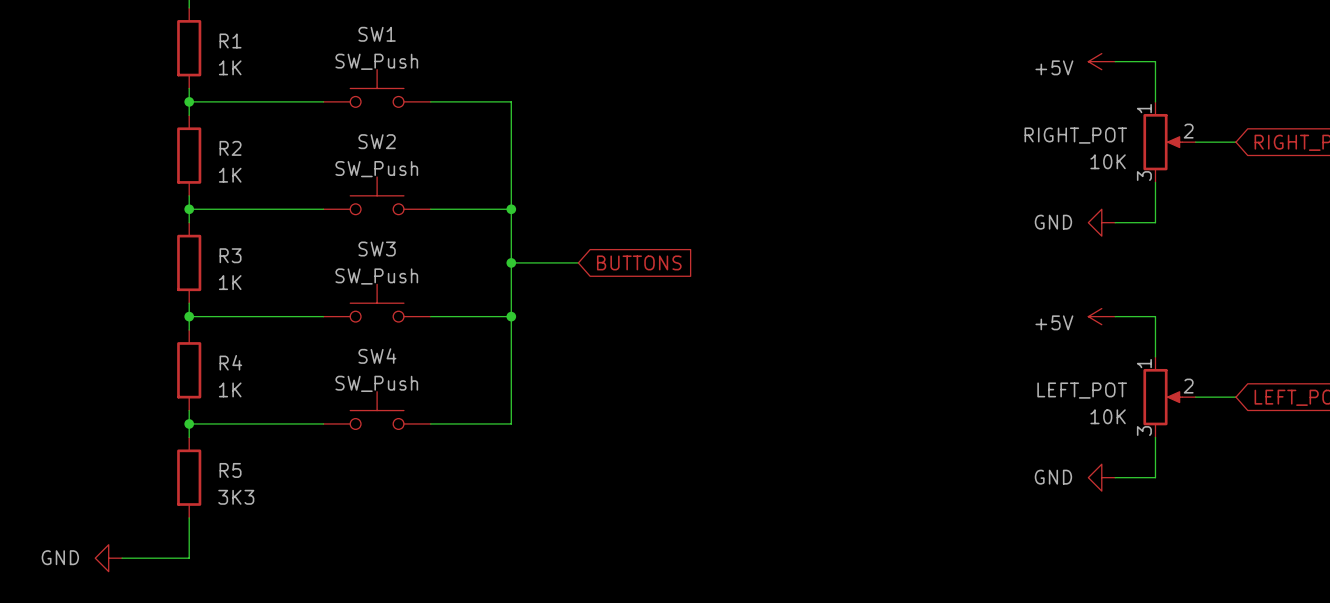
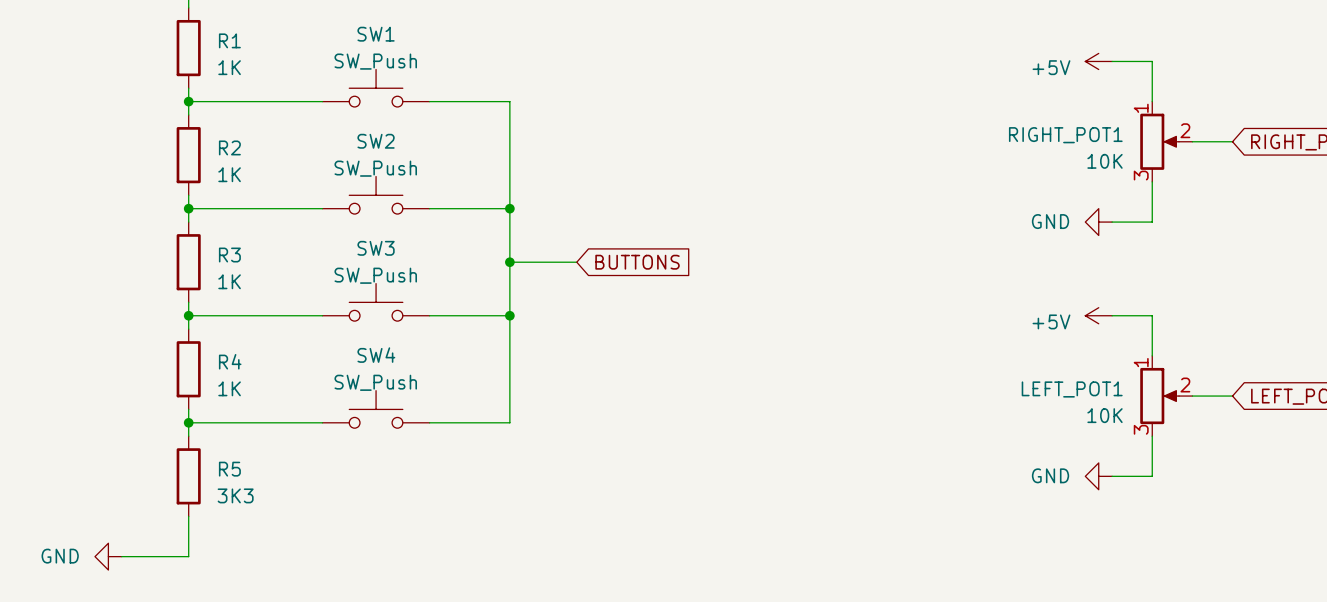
RIGHT_POT name: RIGHT_POT (1075, 135) -> RIGHT_POT1 (1065, 135)
LEFT_POT name: LEFT_POT (1082, 390) -> LEFT_POT1 (1072, 389)

